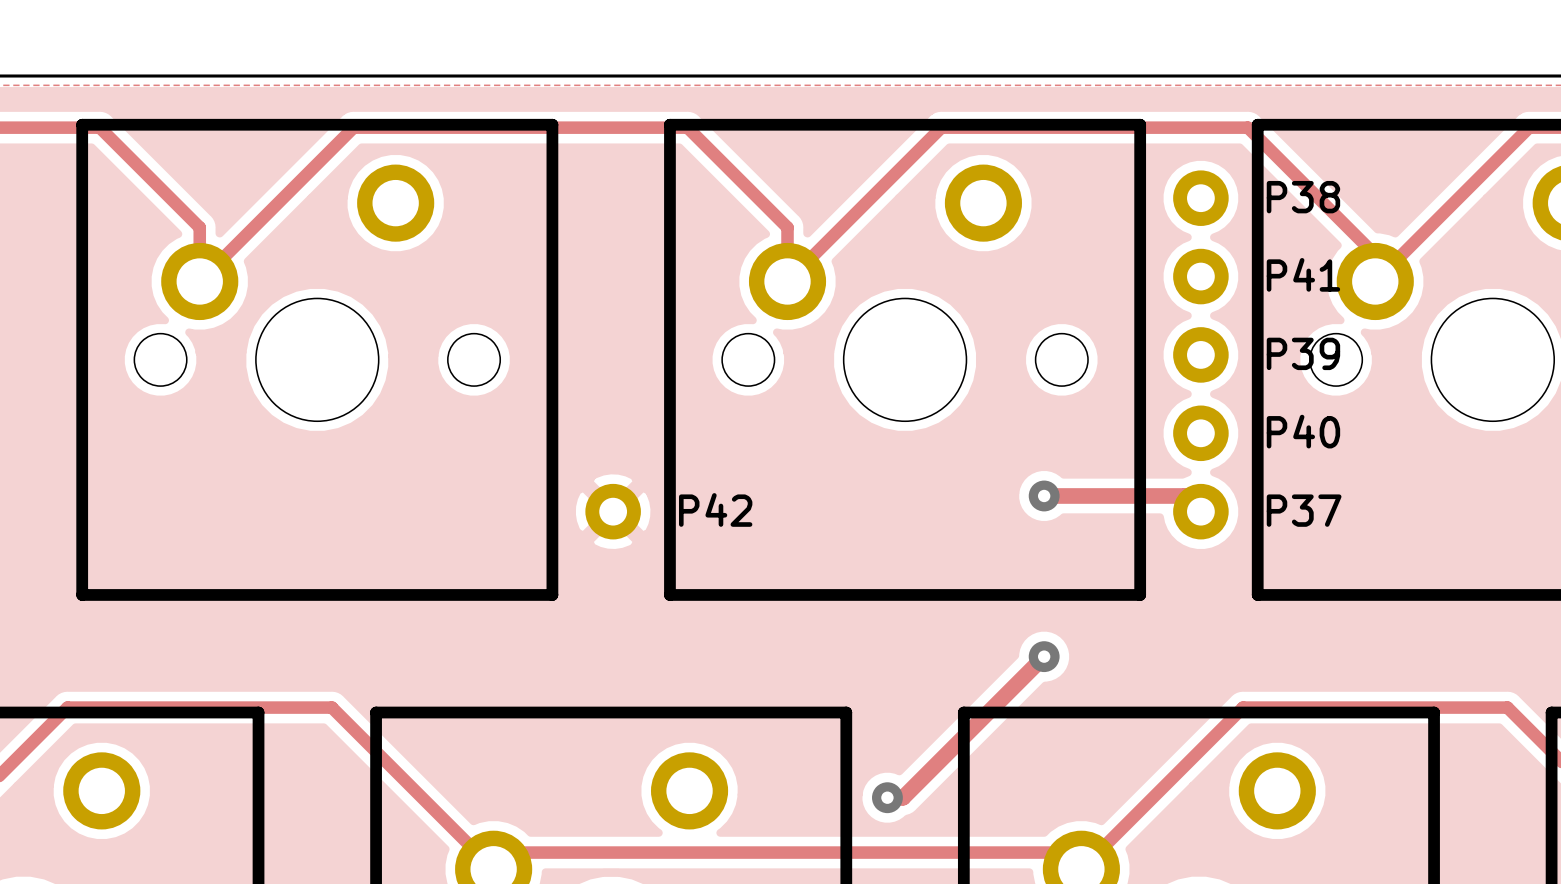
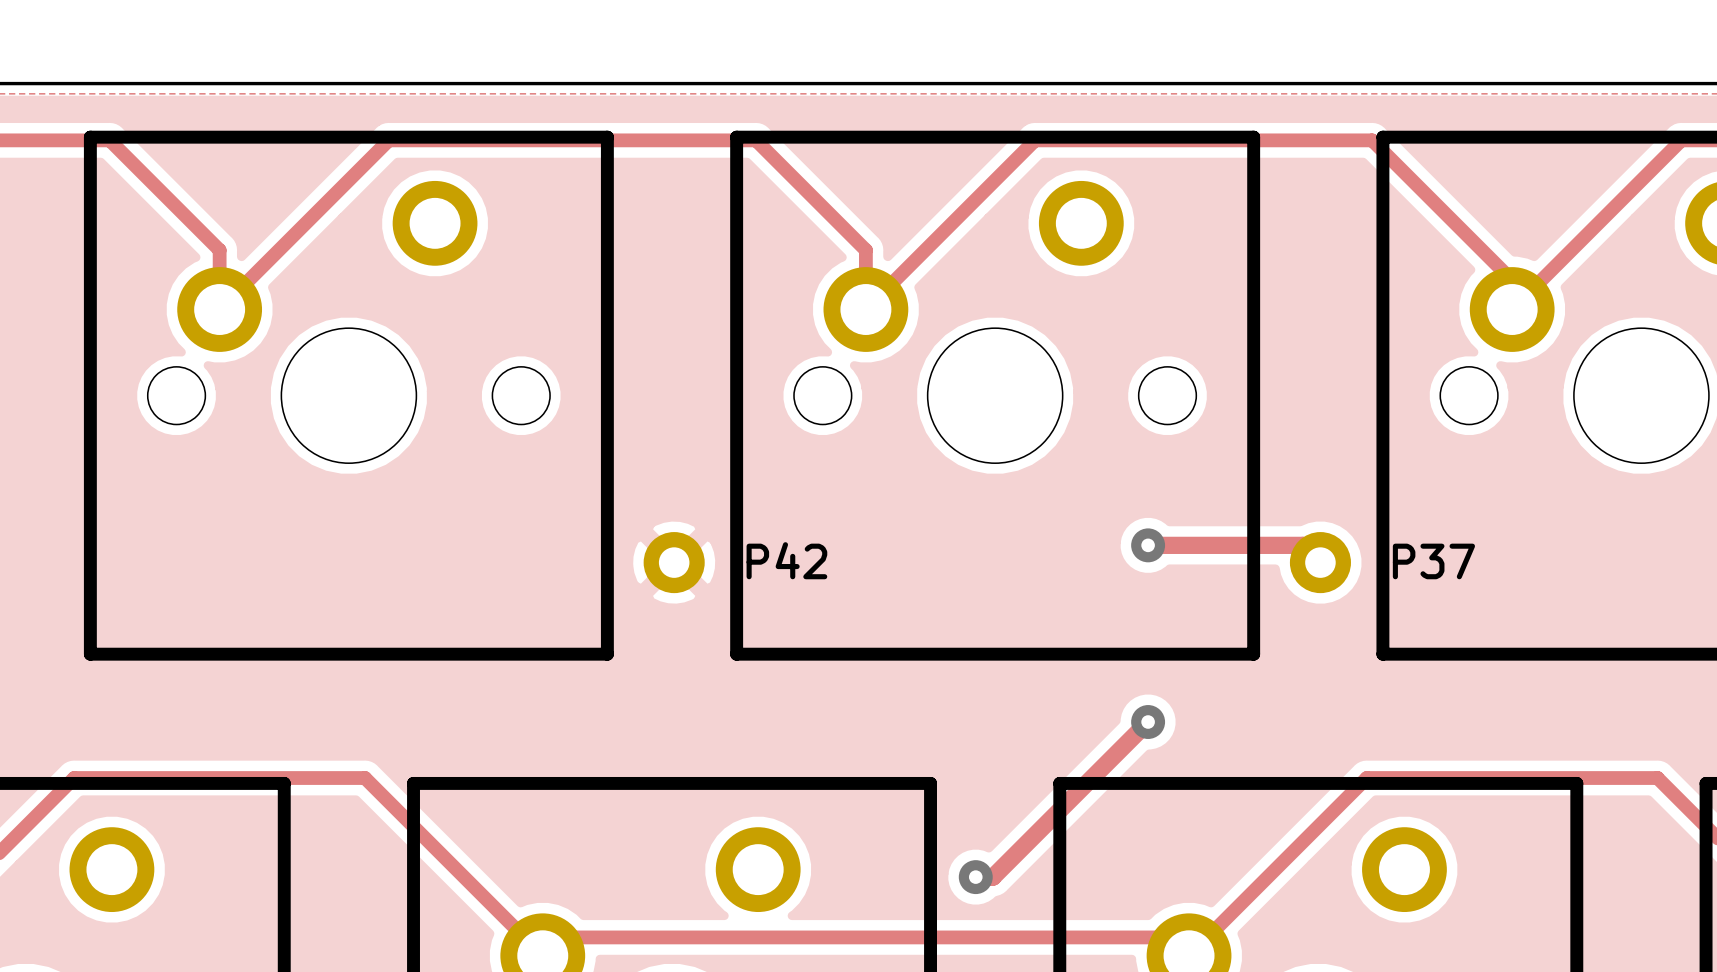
P38: (1200, 198) -> none
P41: (1200, 276) -> none
P39: (1200, 354) -> none
P40: (1200, 433) -> none

